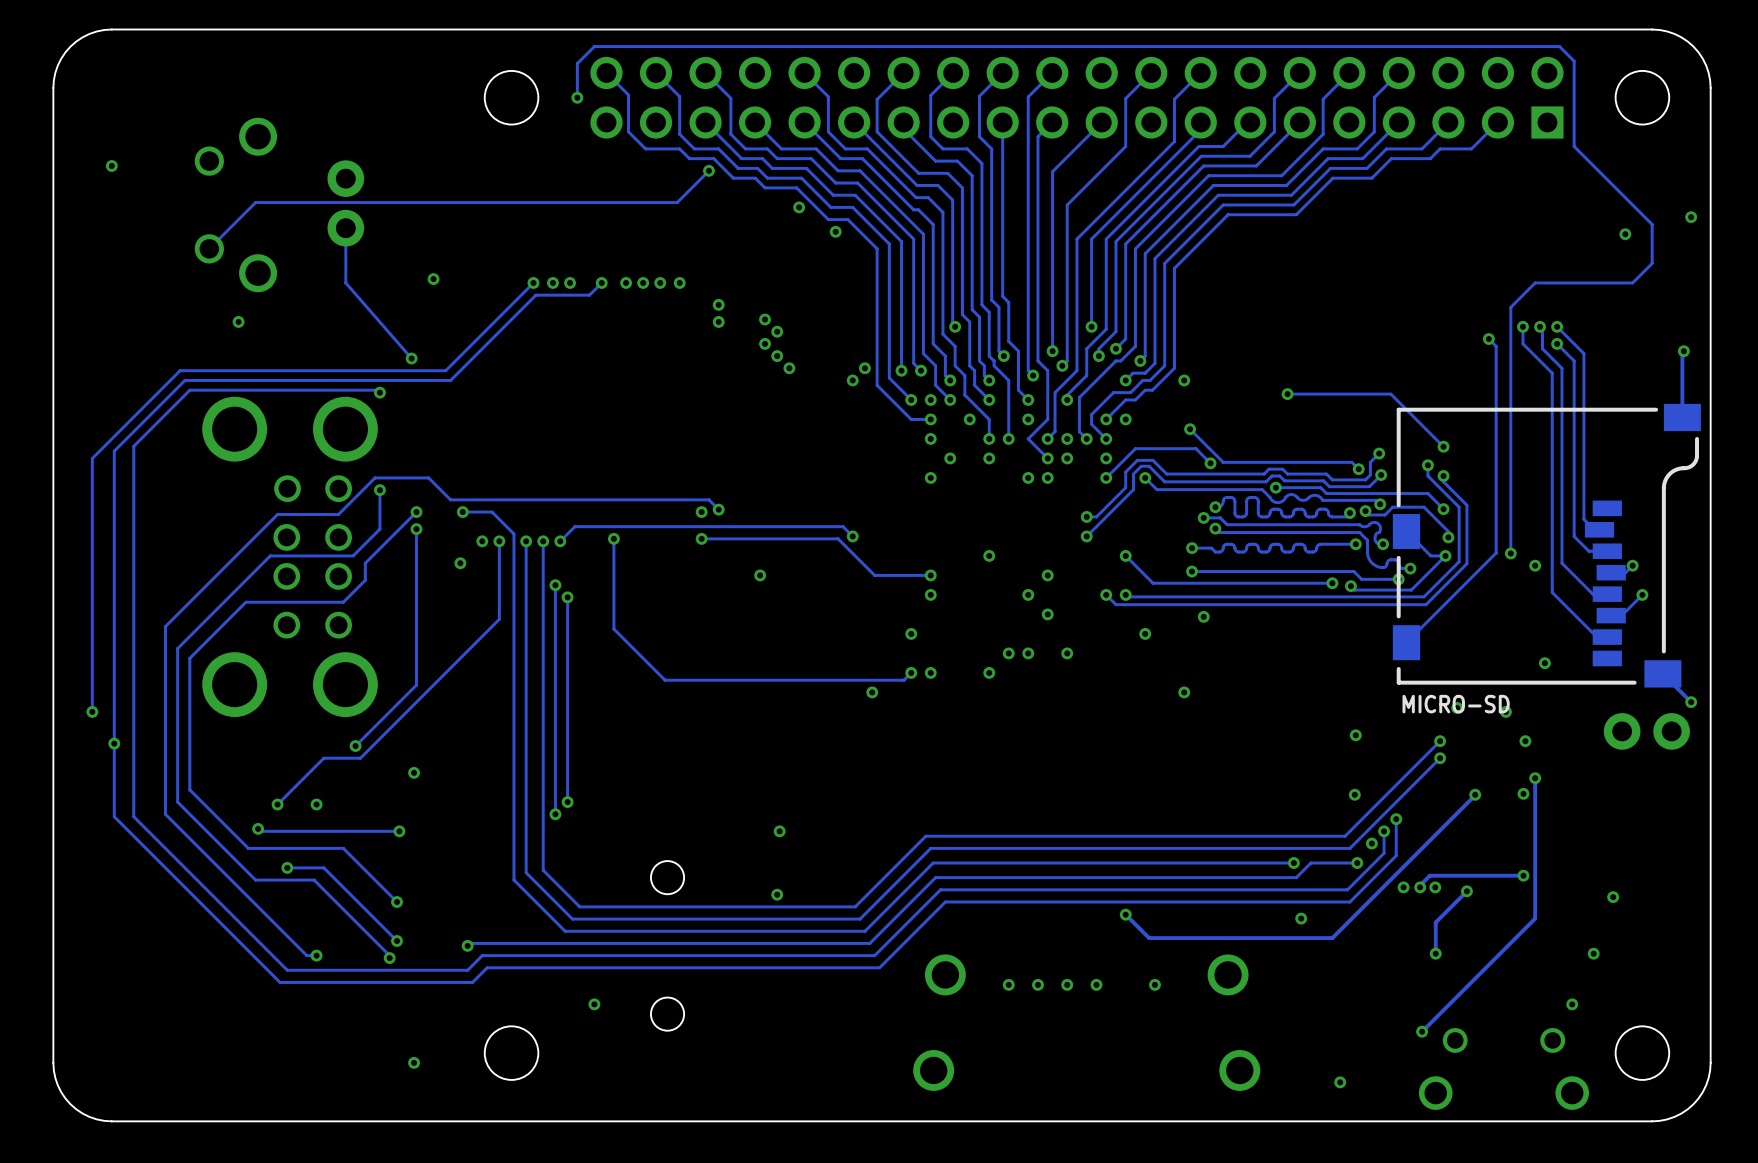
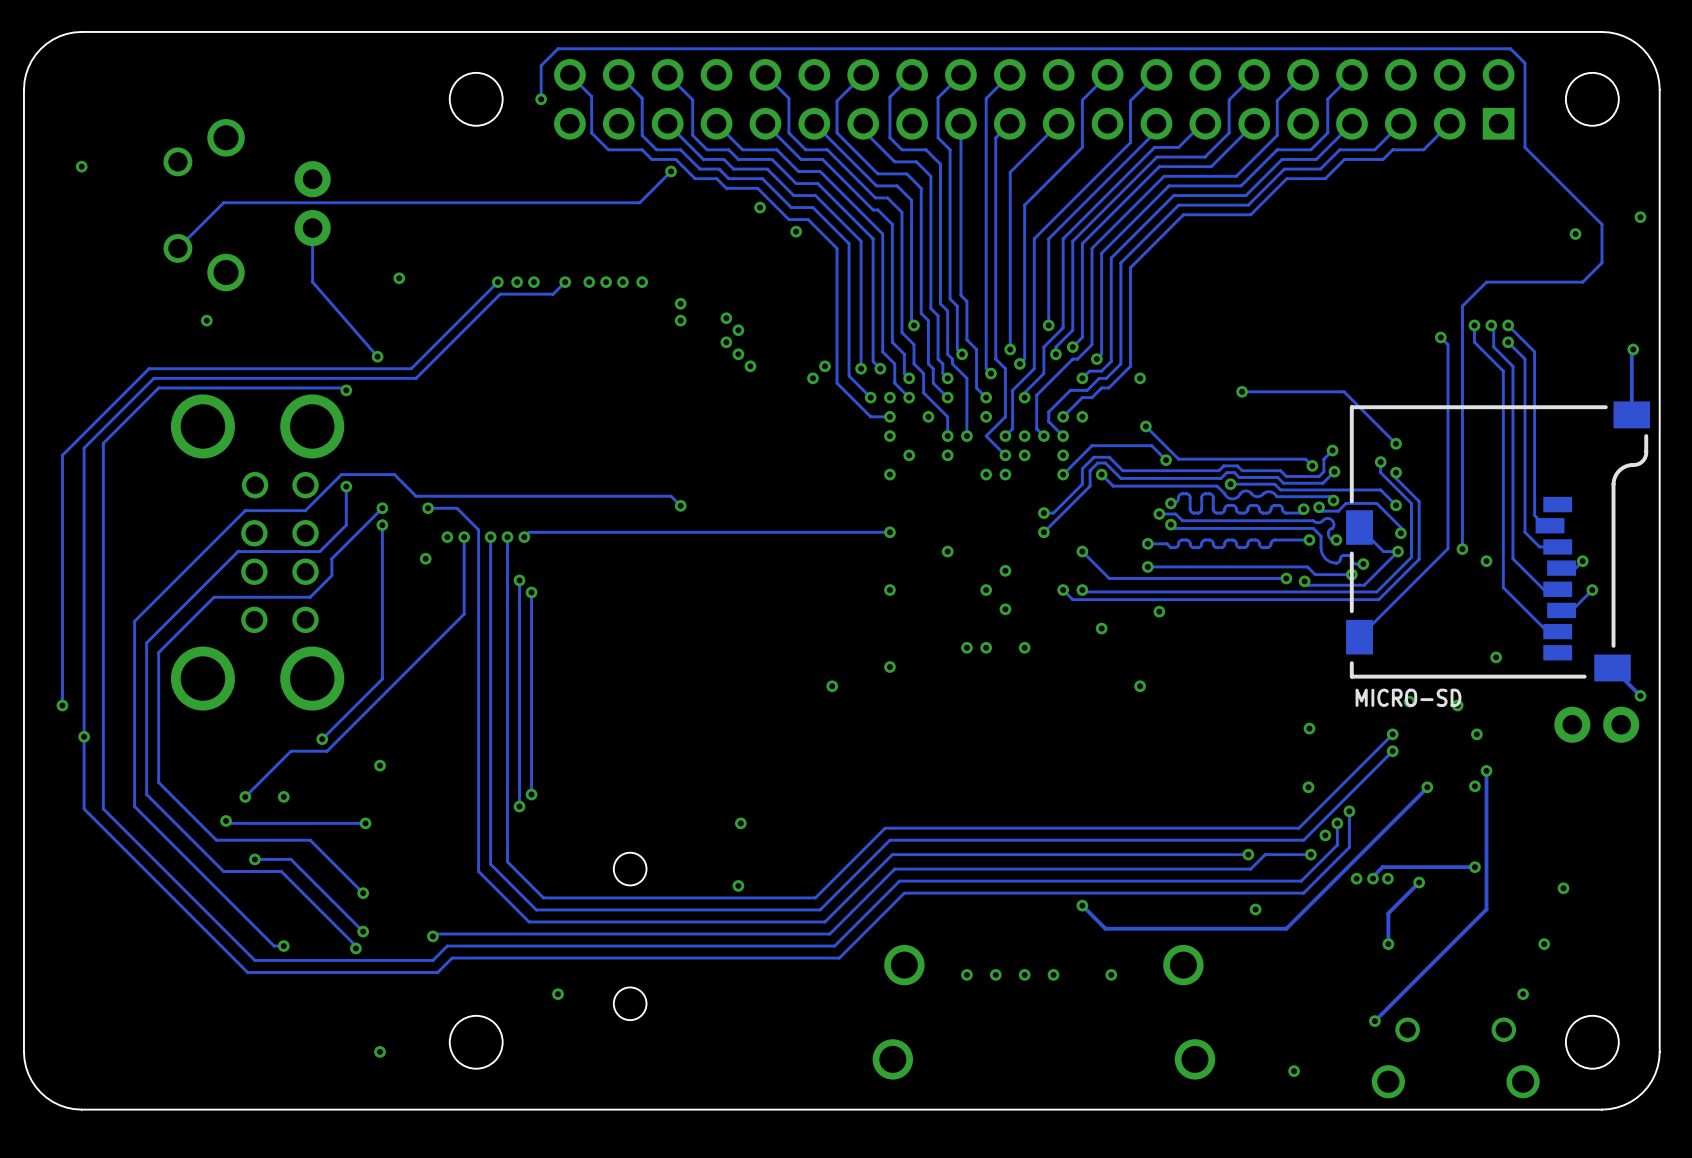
via: (701, 512) -> none
track: (852, 536) (843, 526) (574, 526) (565, 536) -> (889, 532) (529, 532)
via: (852, 536) -> none
via: none -> (889, 532)
track: (613, 538) (613, 629) (665, 680) (903, 680) (911, 672) -> none
via: (613, 538) -> none
track: (701, 538) (838, 538) (874, 575) (930, 575) -> none
via: (701, 538) -> none
via: (760, 575) -> none
via: (930, 575) -> none
via: (911, 633) -> none
via: (911, 672) -> none
via: (989, 672) -> none

